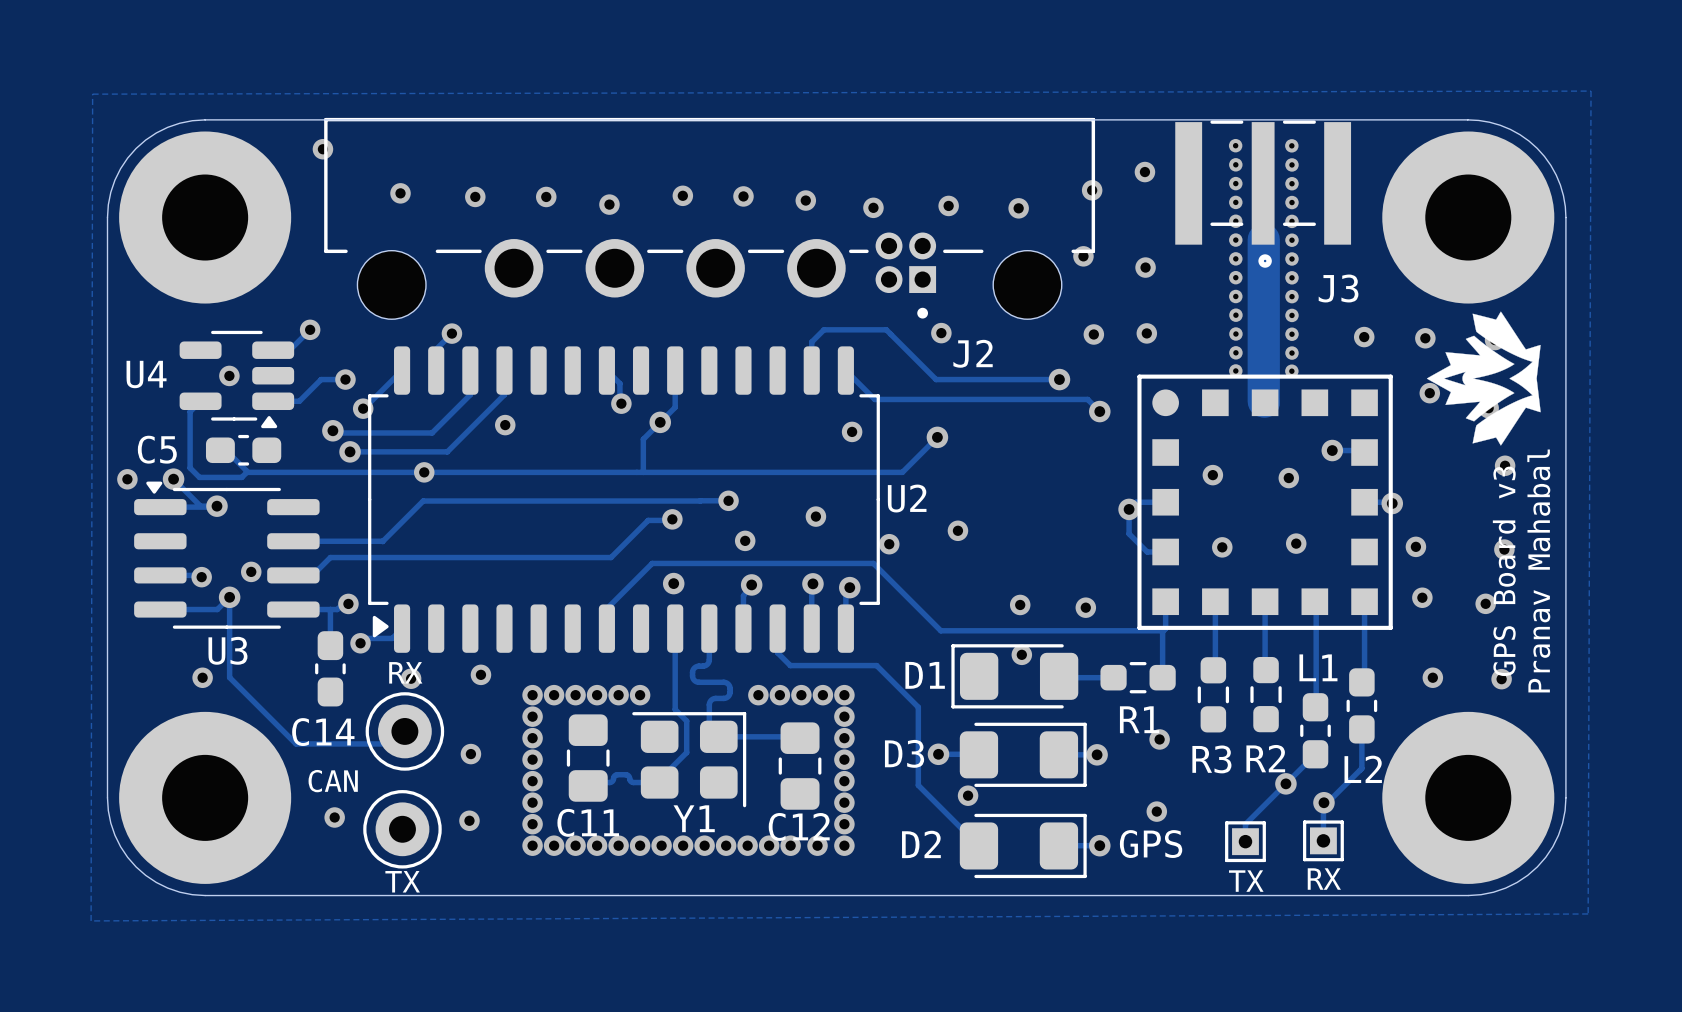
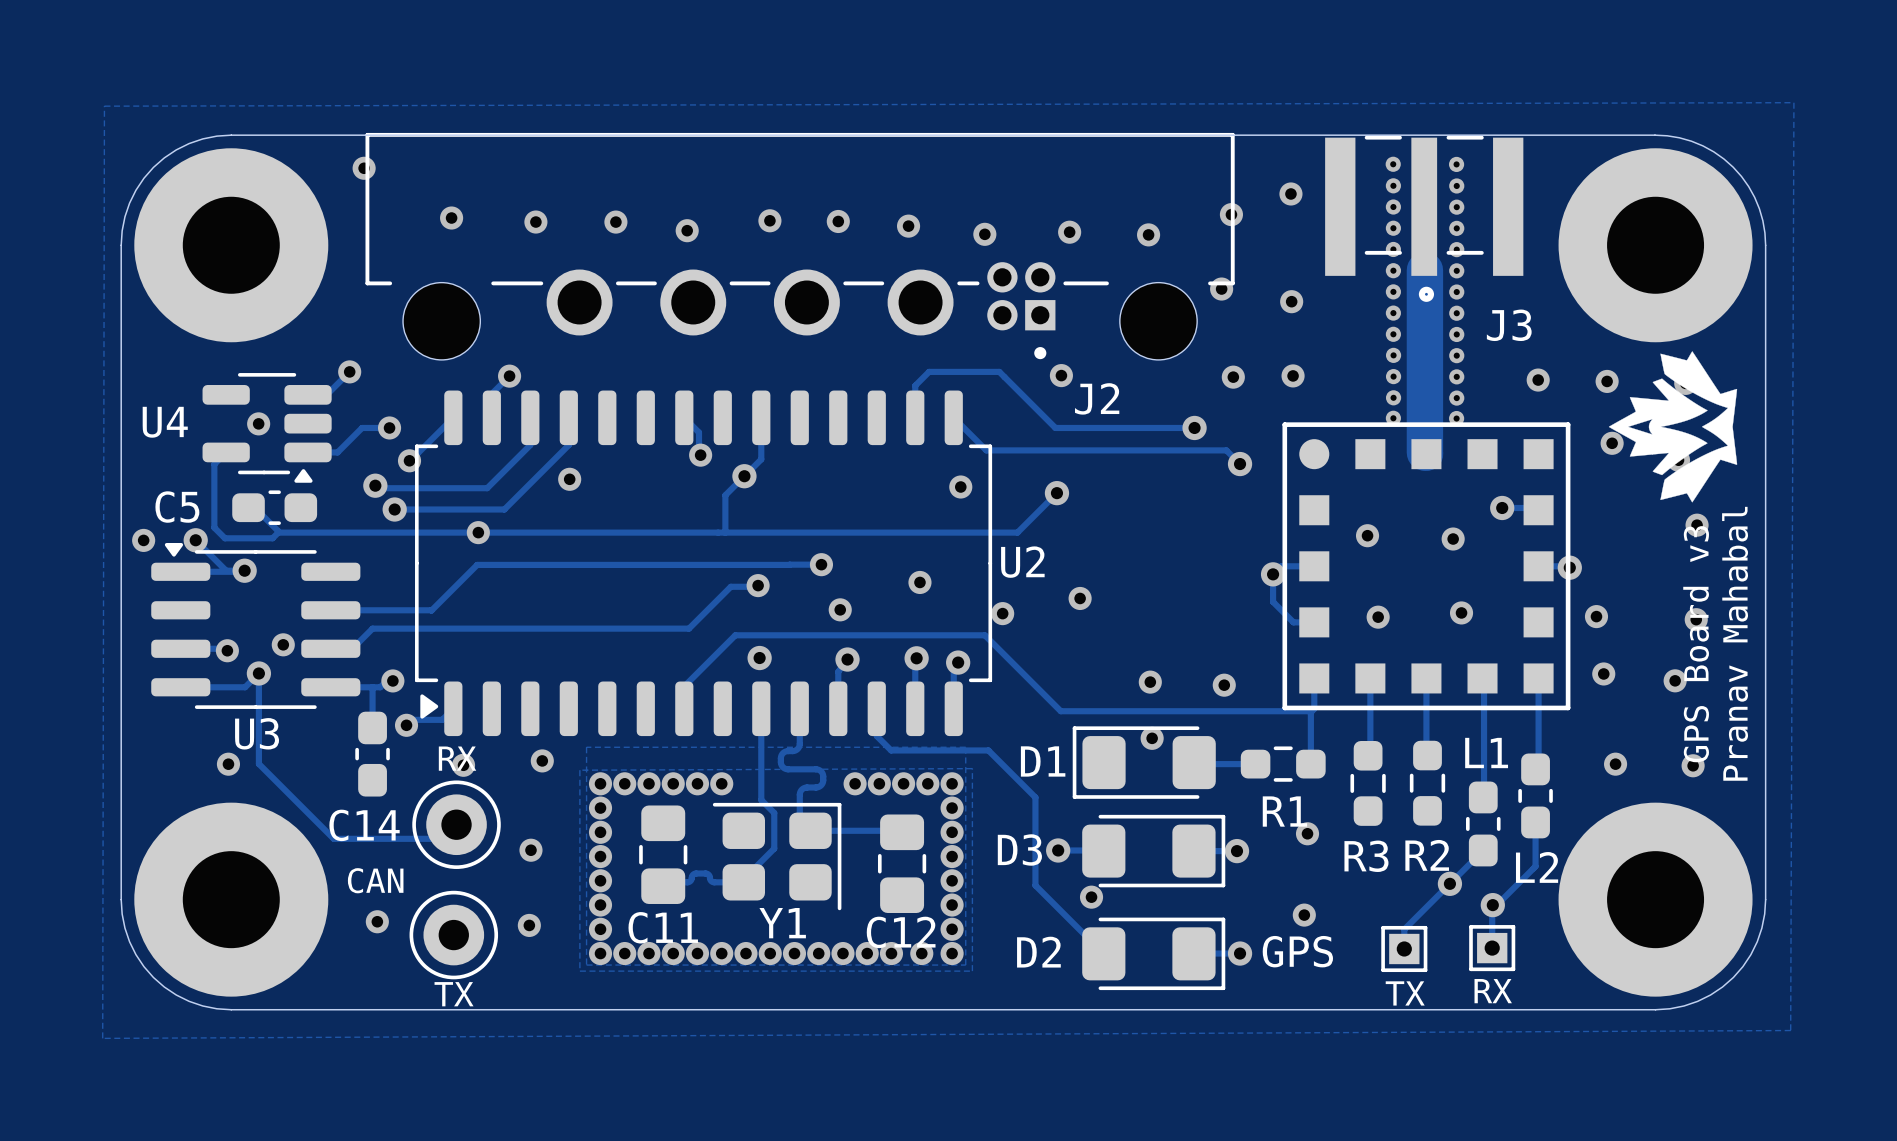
zone outline: none -> (586, 747) (586, 965) (965, 965) (965, 747) (586, 747)
zone outline: none -> (972, 768) (972, 971) (579, 971) (579, 770) (972, 768)

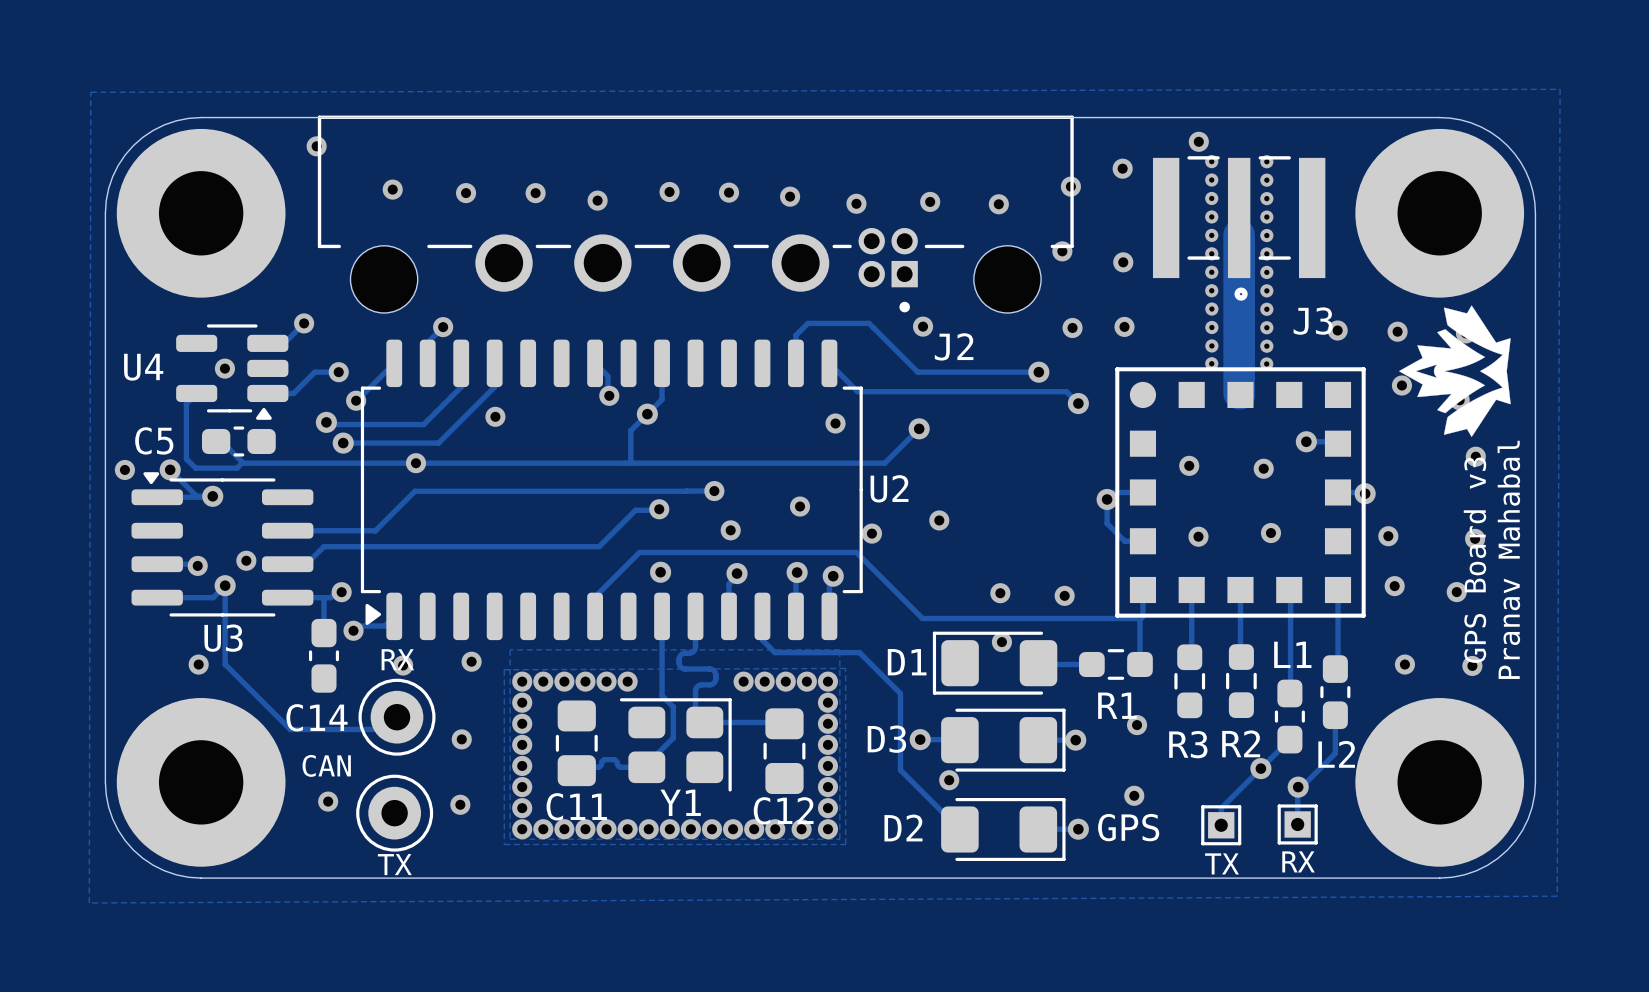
via size: [1385, 156, 1401, 172] -> [1188, 131, 1209, 152]
via: (1456, 164) -> none
J3 position: (1424, 218) -> (1239, 228)

